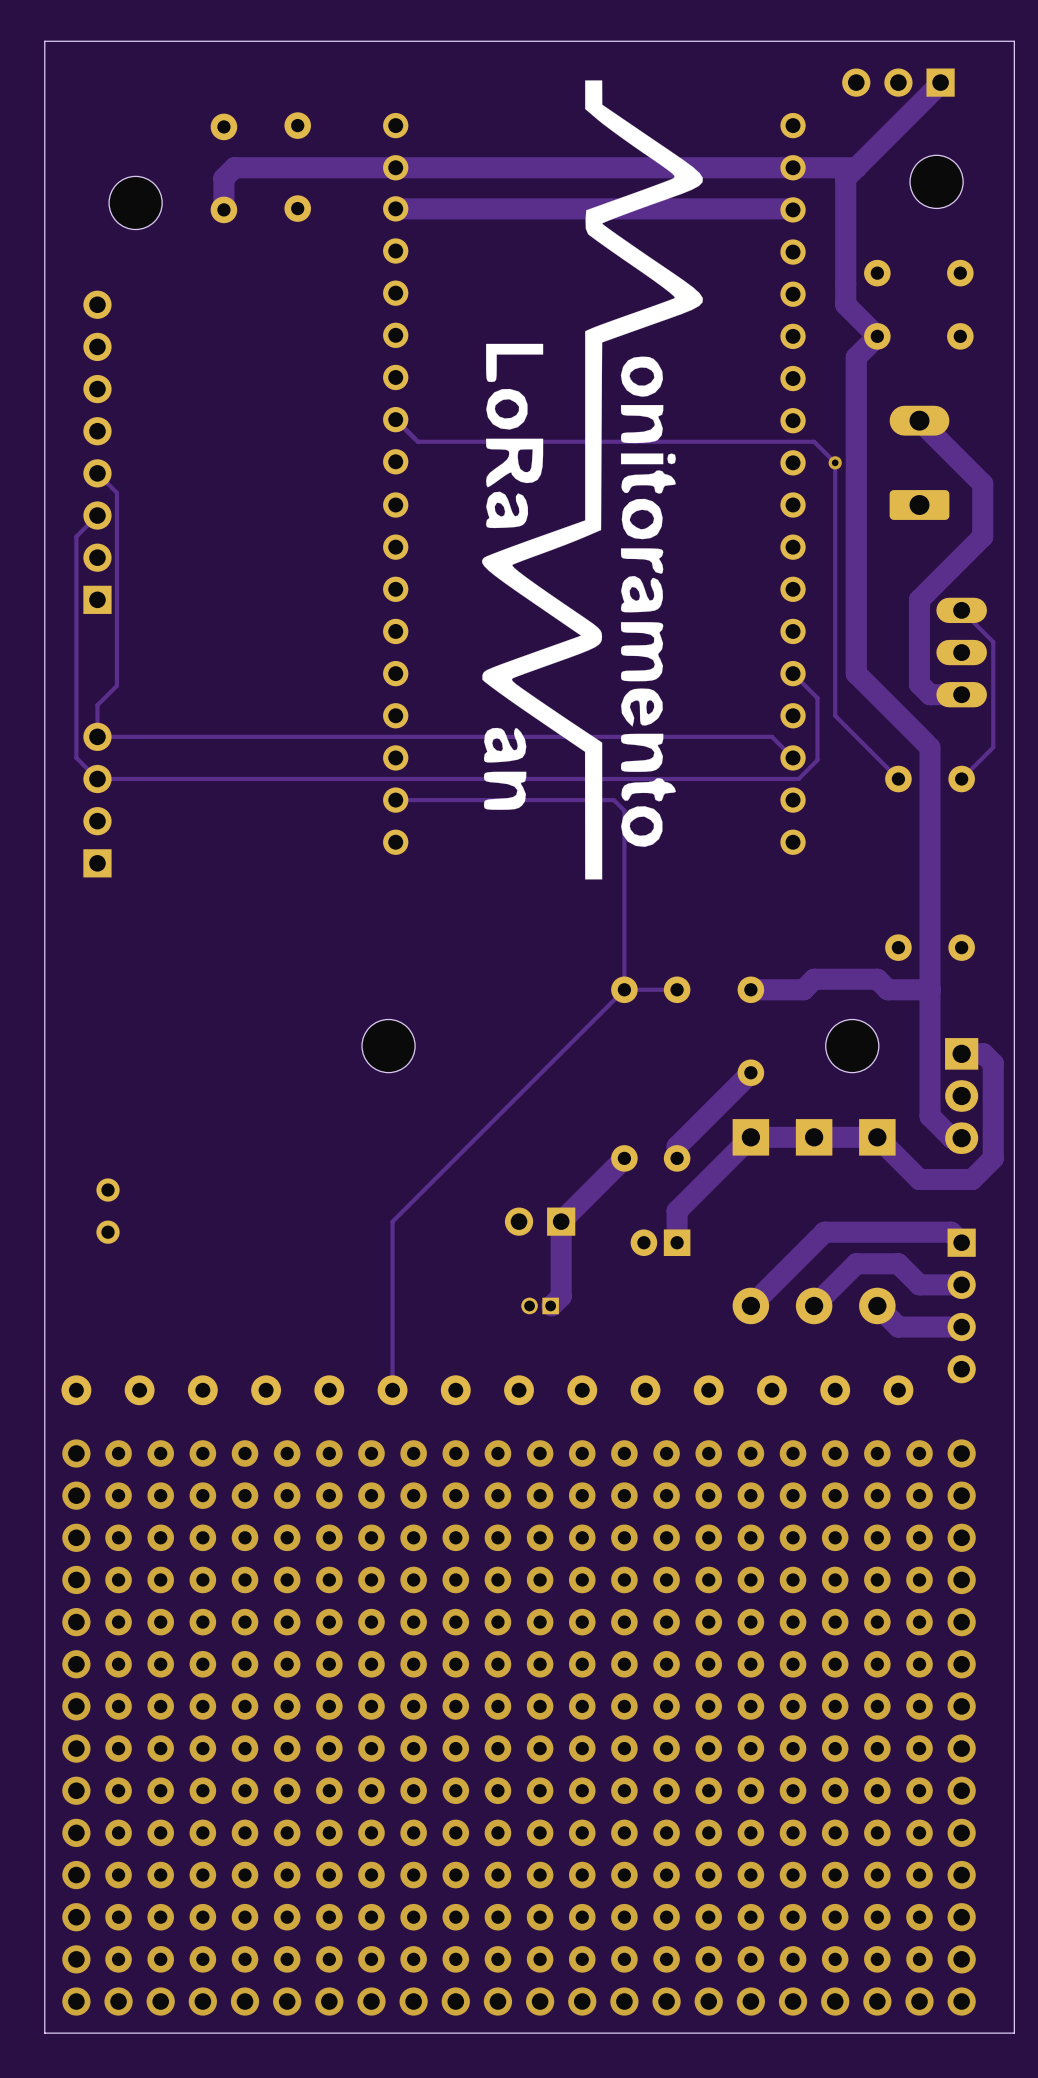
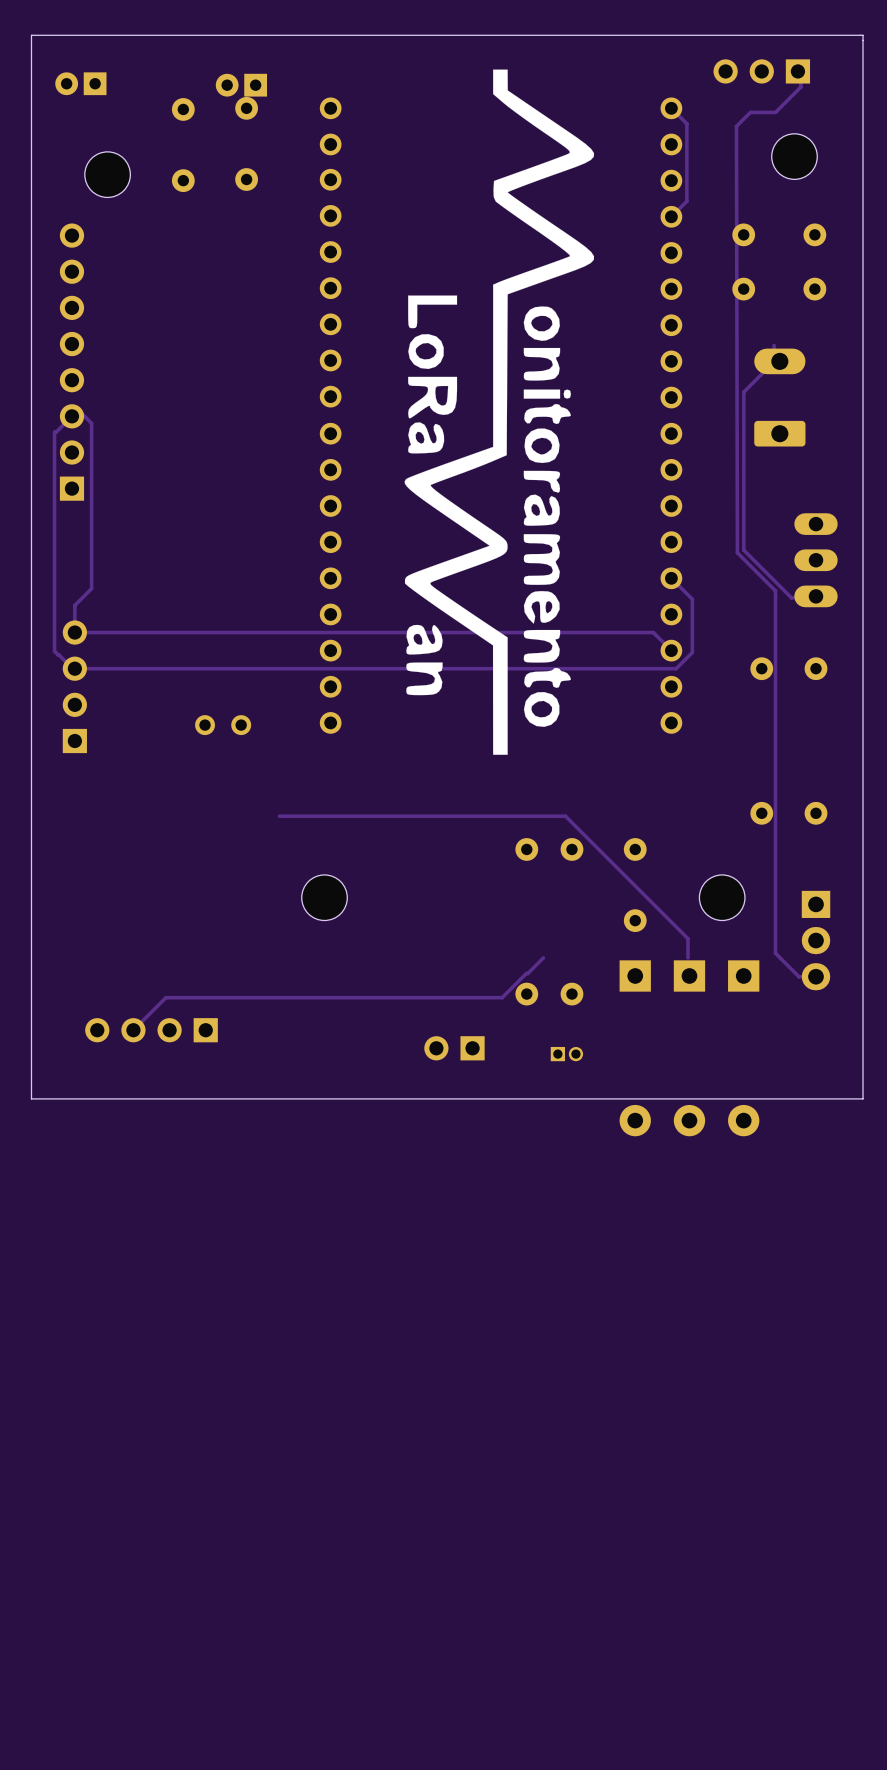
board edge: (1014, 41) (44, 41) (44, 2033) (1014, 2033) (1014, 41) -> (863, 35) (863, 1098) (31, 1098) (31, 35) (863, 35)
track: (940, 83) (845, 178) (845, 304) (877, 336) (856, 357) (856, 673) (925, 742) -> none
part: none -> (80, 83)
part: none -> (241, 85)
track: none -> (671, 108) (686, 123) (686, 201) (671, 216)
track: (856, 167) (234, 167) (223, 178) (223, 209) -> none
track: (395, 208) (793, 209) -> none
track: none -> (774, 345) (774, 361) (743, 392) (743, 550) (791, 597) (816, 597)
track: (395, 419) (417, 441) (814, 441) (835, 462) (835, 715) (898, 779) -> none
track: (919, 420) (982, 483) (982, 536) (919, 599) (919, 684) (930, 694) (961, 694) -> none
part position: (97, 452) -> (71, 362)
via: (835, 462) -> none
track: (97, 515) (76, 536) (76, 757) (97, 779) -> (71, 416) (54, 432) (54, 651) (74, 668)
track: (961, 610) (993, 642) (993, 747) (961, 779) -> none
track: (930, 747) (930, 1116) (951, 1138) -> (800, 71) (800, 87) (775, 112) (750, 112) (736, 126) (737, 552) (775, 590) (775, 953) (798, 976) (807, 976)
track: (395, 800) (613, 800) (624, 810) (624, 989) -> none
track: none -> (279, 816) (565, 816) (688, 938) (688, 957)
track: (624, 989) (392, 1221) (392, 1390) -> none
track: (677, 989) (624, 989) -> none
track: (930, 989) (887, 989) (877, 979) (814, 979) (803, 989) (750, 989) -> none
track: (961, 1053) (983, 1053) (993, 1063) (993, 1158) (972, 1179) (919, 1179) (877, 1137) (750, 1137) (677, 1211) (677, 1242) -> none
track: (750, 1072) (677, 1146) (677, 1158) -> none
track: none -> (543, 957) (502, 997) (165, 997) (133, 1030)
track: (624, 1158) (561, 1221) (561, 1296) (551, 1305) -> none
part: none -> (151, 1030)
part rotation: 0° (108, 1211) -> 90° clockwise (223, 725)
part position: (108, 1211) -> (223, 725)
part: (660, 1242) -> none
track: (961, 1242) (951, 1232) (824, 1232) (750, 1305) -> none
track: (961, 1284) (919, 1284) (898, 1263) (856, 1263) (814, 1305) -> none
part rotation: 0° (540, 1305) -> 180° (566, 1054)
part position: (540, 1305) -> (566, 1054)
track: (877, 1305) (898, 1327) (961, 1327) -> none
part: (961, 1305) -> none
part: (76, 1390) -> none
part: (139, 1390) -> none
part: (202, 1390) -> none
part: (266, 1390) -> none
part: (329, 1390) -> none
part: (392, 1390) -> none
part: (455, 1390) -> none
part: (519, 1390) -> none
part: (582, 1390) -> none
part: (645, 1390) -> none
part: (708, 1390) -> none
part: (771, 1390) -> none
part: (835, 1390) -> none
part: (898, 1390) -> none
via: (76, 1453) -> none
via: (118, 1453) -> none
via: (160, 1453) -> none
via: (202, 1453) -> none
via: (245, 1453) -> none
via: (287, 1453) -> none
via: (329, 1453) -> none
via: (371, 1453) -> none
via: (413, 1453) -> none
via: (455, 1453) -> none
via: (497, 1453) -> none
via: (540, 1453) -> none
via: (582, 1453) -> none
via: (624, 1453) -> none
via: (666, 1453) -> none
via: (708, 1453) -> none
via: (750, 1453) -> none
via: (793, 1453) -> none
via: (835, 1453) -> none
via: (877, 1453) -> none
via: (919, 1453) -> none
via: (961, 1453) -> none
via: (76, 1495) -> none
via: (118, 1495) -> none
via: (160, 1495) -> none
via: (202, 1495) -> none
via: (245, 1495) -> none
via: (287, 1495) -> none
via: (329, 1495) -> none
via: (371, 1495) -> none
via: (413, 1495) -> none
via: (455, 1495) -> none
via: (497, 1495) -> none
via: (540, 1495) -> none
via: (582, 1495) -> none
via: (624, 1495) -> none
via: (666, 1495) -> none
via: (708, 1495) -> none
via: (750, 1495) -> none
via: (793, 1495) -> none
via: (835, 1495) -> none
via: (877, 1495) -> none
via: (919, 1495) -> none
via: (961, 1495) -> none
via: (76, 1537) -> none
via: (118, 1537) -> none
via: (160, 1537) -> none
via: (202, 1537) -> none
via: (245, 1537) -> none
via: (287, 1537) -> none
via: (329, 1537) -> none
via: (371, 1537) -> none
via: (413, 1537) -> none
via: (455, 1537) -> none
via: (497, 1537) -> none
via: (540, 1537) -> none
via: (582, 1537) -> none
via: (624, 1537) -> none
via: (666, 1537) -> none
via: (708, 1537) -> none
via: (750, 1537) -> none
via: (793, 1537) -> none
via: (835, 1537) -> none
via: (877, 1537) -> none
via: (919, 1537) -> none
via: (961, 1537) -> none
via: (76, 1579) -> none
via: (118, 1579) -> none
via: (160, 1579) -> none
via: (202, 1579) -> none
via: (245, 1579) -> none
via: (287, 1579) -> none
via: (329, 1579) -> none
via: (371, 1579) -> none
via: (413, 1579) -> none
via: (455, 1579) -> none
via: (497, 1579) -> none
via: (540, 1579) -> none
via: (582, 1579) -> none
via: (624, 1579) -> none
via: (666, 1579) -> none
via: (708, 1579) -> none
via: (750, 1579) -> none
via: (793, 1579) -> none
via: (835, 1579) -> none
via: (877, 1579) -> none
via: (919, 1579) -> none
via: (961, 1579) -> none
via: (76, 1622) -> none
via: (118, 1622) -> none
via: (160, 1622) -> none
via: (202, 1622) -> none
via: (245, 1622) -> none
via: (287, 1622) -> none
via: (329, 1622) -> none
via: (371, 1622) -> none
via: (413, 1622) -> none
via: (455, 1622) -> none
via: (497, 1622) -> none
via: (540, 1622) -> none
via: (582, 1622) -> none
via: (624, 1622) -> none
via: (666, 1622) -> none
via: (708, 1622) -> none
via: (750, 1622) -> none
via: (793, 1622) -> none
via: (835, 1622) -> none
via: (877, 1622) -> none
via: (919, 1622) -> none
via: (961, 1622) -> none
via: (76, 1664) -> none
via: (118, 1664) -> none
via: (160, 1664) -> none
via: (202, 1664) -> none
via: (245, 1664) -> none
via: (287, 1664) -> none
via: (329, 1664) -> none
via: (371, 1664) -> none
via: (413, 1664) -> none
via: (455, 1664) -> none
via: (497, 1664) -> none
via: (540, 1664) -> none
via: (582, 1664) -> none
via: (624, 1664) -> none
via: (666, 1664) -> none
via: (708, 1664) -> none
via: (750, 1664) -> none
via: (793, 1664) -> none
via: (835, 1664) -> none
via: (877, 1664) -> none
via: (919, 1664) -> none
via: (961, 1664) -> none
via: (76, 1706) -> none
via: (118, 1706) -> none
via: (160, 1706) -> none
via: (202, 1706) -> none
via: (245, 1706) -> none
via: (287, 1706) -> none
via: (329, 1706) -> none
via: (371, 1706) -> none
via: (413, 1706) -> none
via: (455, 1706) -> none
via: (497, 1706) -> none
via: (540, 1706) -> none
via: (582, 1706) -> none
via: (624, 1706) -> none
via: (666, 1706) -> none
via: (708, 1706) -> none
via: (750, 1706) -> none
via: (793, 1706) -> none
via: (835, 1706) -> none
via: (877, 1706) -> none
via: (919, 1706) -> none
via: (961, 1706) -> none
via: (76, 1748) -> none
via: (118, 1748) -> none
via: (160, 1748) -> none
via: (202, 1748) -> none
via: (245, 1748) -> none
via: (287, 1748) -> none
via: (329, 1748) -> none
via: (371, 1748) -> none
via: (413, 1748) -> none
via: (455, 1748) -> none
via: (497, 1748) -> none
via: (540, 1748) -> none
via: (582, 1748) -> none
via: (624, 1748) -> none
via: (666, 1748) -> none
via: (708, 1748) -> none
via: (750, 1748) -> none
via: (793, 1748) -> none
via: (835, 1748) -> none
via: (877, 1748) -> none
via: (919, 1748) -> none
via: (961, 1748) -> none
via: (76, 1790) -> none
via: (118, 1790) -> none
via: (160, 1790) -> none
via: (202, 1790) -> none
via: (245, 1790) -> none
via: (287, 1790) -> none
via: (329, 1790) -> none
via: (371, 1790) -> none
via: (413, 1790) -> none
via: (455, 1790) -> none
via: (497, 1790) -> none
via: (540, 1790) -> none
via: (582, 1790) -> none
via: (624, 1790) -> none
via: (666, 1790) -> none
via: (708, 1790) -> none
via: (750, 1790) -> none
via: (793, 1790) -> none
via: (835, 1790) -> none
via: (877, 1790) -> none
via: (919, 1790) -> none
via: (961, 1790) -> none
via: (76, 1832) -> none
via: (118, 1832) -> none
via: (160, 1832) -> none
via: (202, 1832) -> none
via: (245, 1832) -> none
via: (287, 1832) -> none
via: (329, 1832) -> none
via: (371, 1832) -> none
via: (413, 1832) -> none
via: (455, 1832) -> none
via: (497, 1832) -> none
via: (540, 1832) -> none
via: (582, 1832) -> none
via: (624, 1832) -> none
via: (666, 1832) -> none
via: (708, 1832) -> none
via: (750, 1832) -> none
via: (793, 1832) -> none
via: (835, 1832) -> none
via: (877, 1832) -> none
via: (919, 1832) -> none
via: (961, 1832) -> none
via: (76, 1875) -> none
via: (118, 1875) -> none
via: (160, 1875) -> none
via: (202, 1875) -> none
via: (245, 1875) -> none
via: (287, 1875) -> none
via: (329, 1875) -> none
via: (371, 1875) -> none
via: (413, 1875) -> none
via: (455, 1875) -> none
via: (497, 1875) -> none
via: (540, 1875) -> none
via: (582, 1875) -> none
via: (624, 1875) -> none
via: (666, 1875) -> none
via: (708, 1875) -> none
via: (750, 1875) -> none
via: (793, 1875) -> none
via: (835, 1875) -> none
via: (877, 1875) -> none
via: (919, 1875) -> none
via: (961, 1875) -> none
via: (76, 1917) -> none
via: (118, 1917) -> none
via: (160, 1917) -> none
via: (202, 1917) -> none
via: (245, 1917) -> none
via: (287, 1917) -> none
via: (329, 1917) -> none
via: (371, 1917) -> none
via: (413, 1917) -> none
via: (455, 1917) -> none
via: (497, 1917) -> none
via: (540, 1917) -> none
via: (582, 1917) -> none
via: (624, 1917) -> none
via: (666, 1917) -> none
via: (708, 1917) -> none
via: (750, 1917) -> none
via: (793, 1917) -> none
via: (835, 1917) -> none
via: (877, 1917) -> none
via: (919, 1917) -> none
via: (961, 1917) -> none
via: (76, 1959) -> none
via: (118, 1959) -> none
via: (160, 1959) -> none
via: (202, 1959) -> none
via: (245, 1959) -> none
via: (287, 1959) -> none
via: (329, 1959) -> none
via: (371, 1959) -> none
via: (413, 1959) -> none
via: (455, 1959) -> none
via: (497, 1959) -> none
via: (540, 1959) -> none
via: (582, 1959) -> none
via: (624, 1959) -> none
via: (666, 1959) -> none
via: (708, 1959) -> none
via: (750, 1959) -> none
via: (793, 1959) -> none
via: (835, 1959) -> none
via: (877, 1959) -> none
via: (919, 1959) -> none
via: (961, 1959) -> none
via: (76, 2001) -> none
via: (118, 2001) -> none
via: (160, 2001) -> none
via: (202, 2001) -> none
via: (245, 2001) -> none
via: (287, 2001) -> none
via: (329, 2001) -> none
via: (371, 2001) -> none
via: (413, 2001) -> none
via: (455, 2001) -> none
via: (497, 2001) -> none
via: (540, 2001) -> none
via: (582, 2001) -> none
via: (624, 2001) -> none
via: (666, 2001) -> none
via: (708, 2001) -> none
via: (750, 2001) -> none
via: (793, 2001) -> none
via: (835, 2001) -> none
via: (877, 2001) -> none
via: (919, 2001) -> none
via: (961, 2001) -> none

